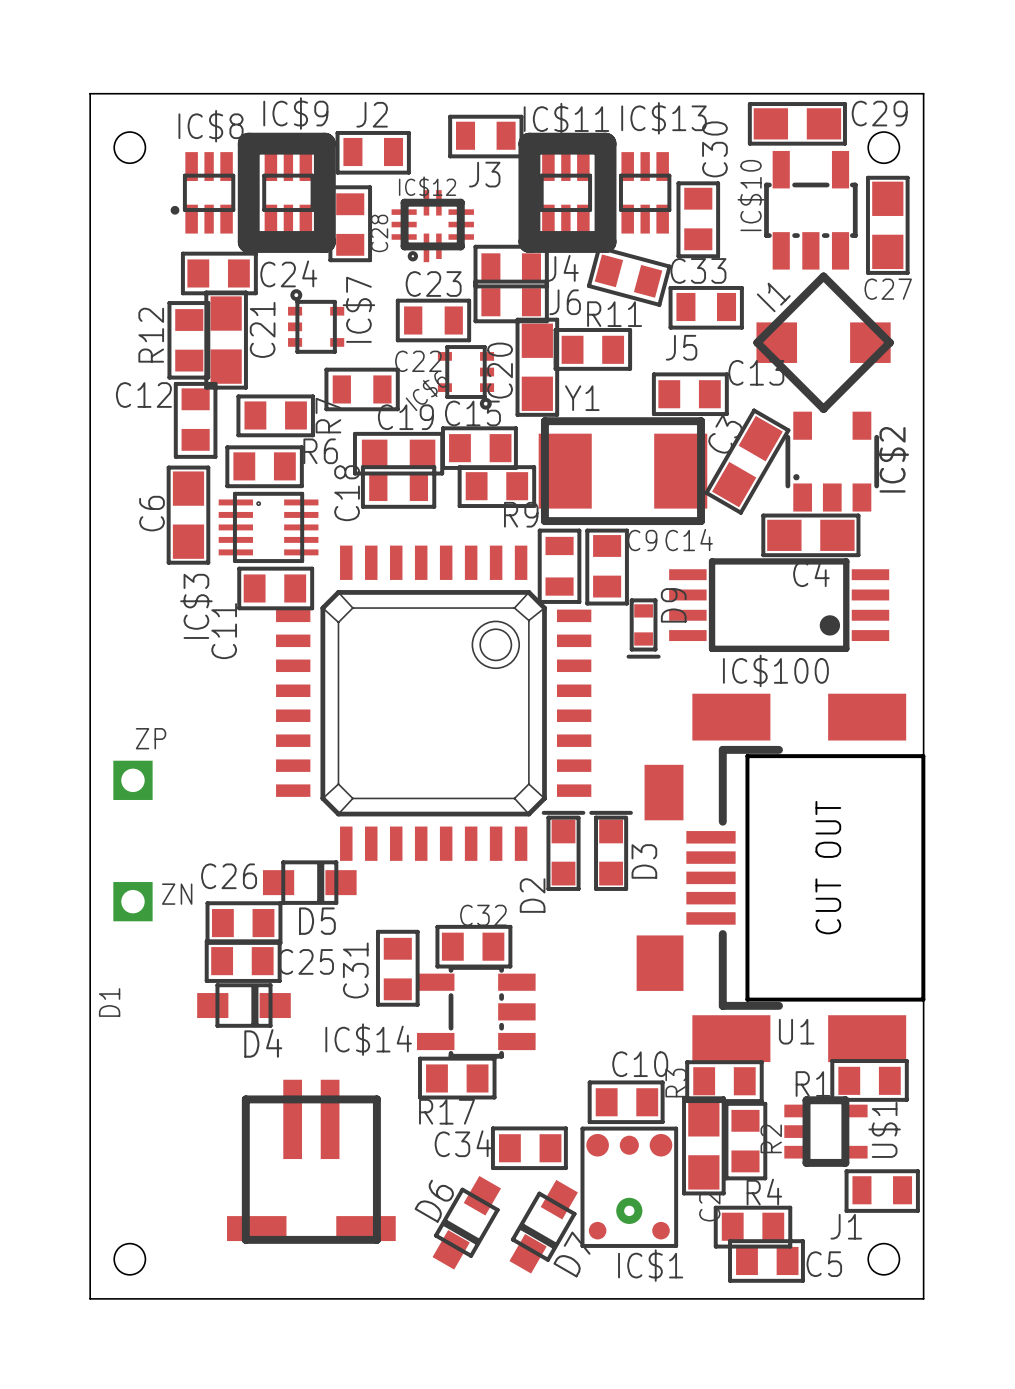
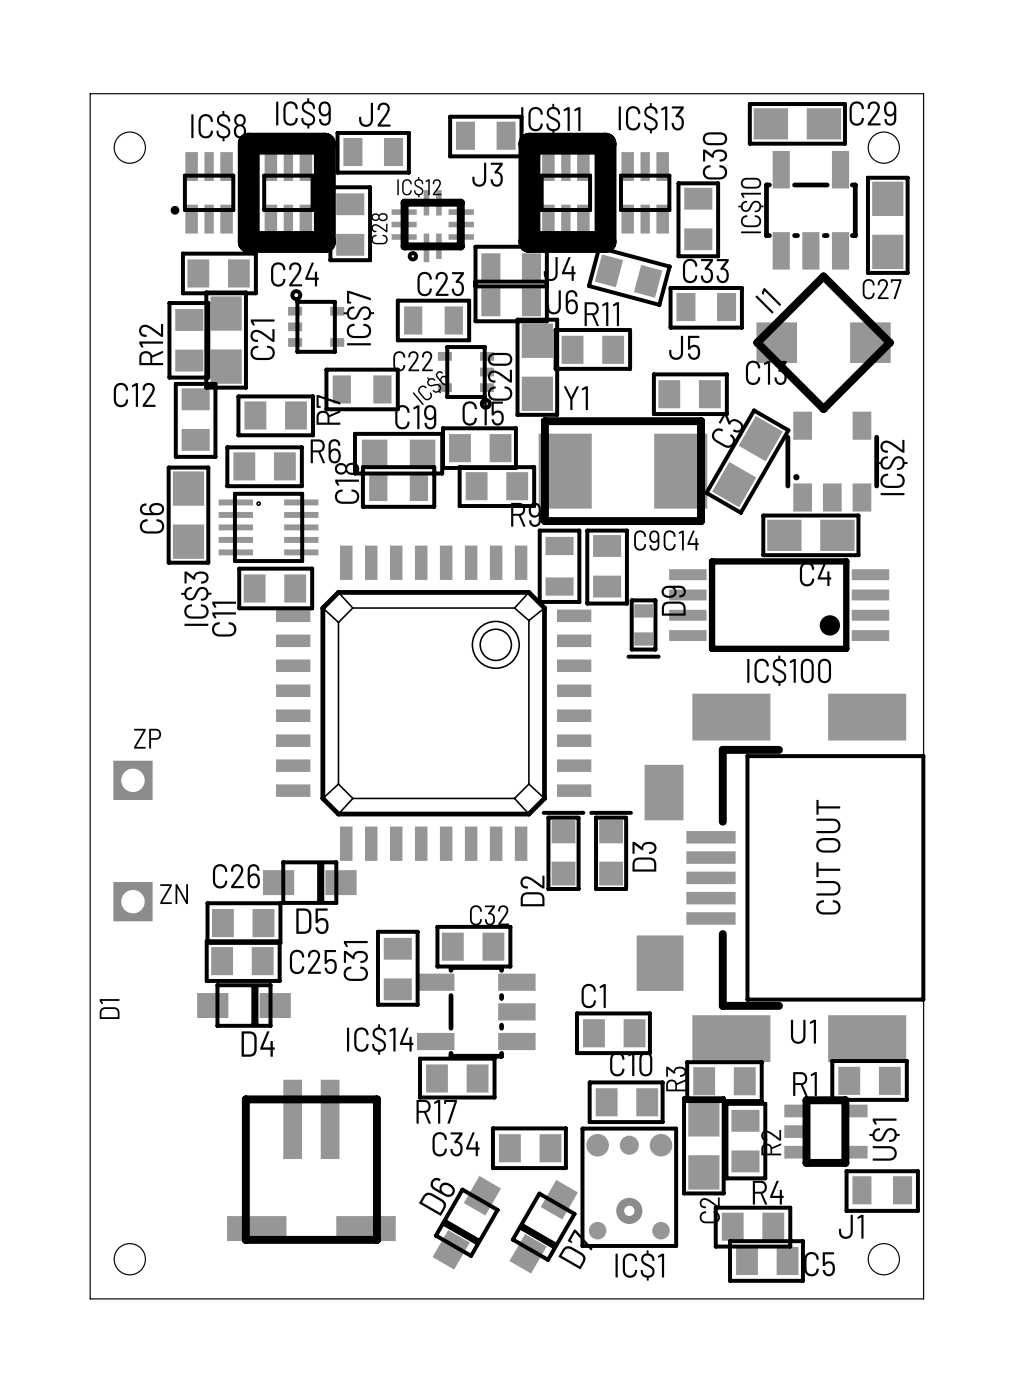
C1: none -> (613, 1033)

